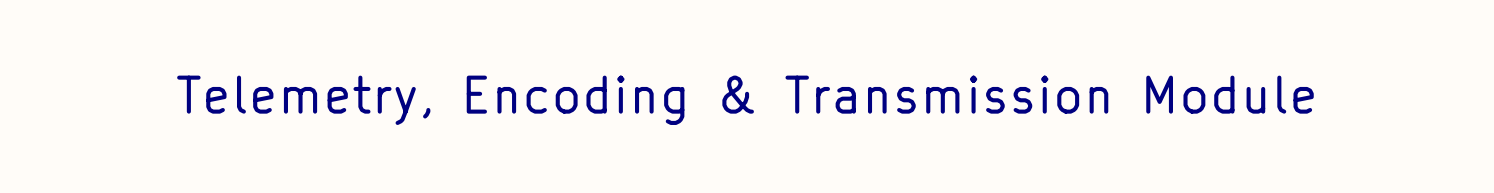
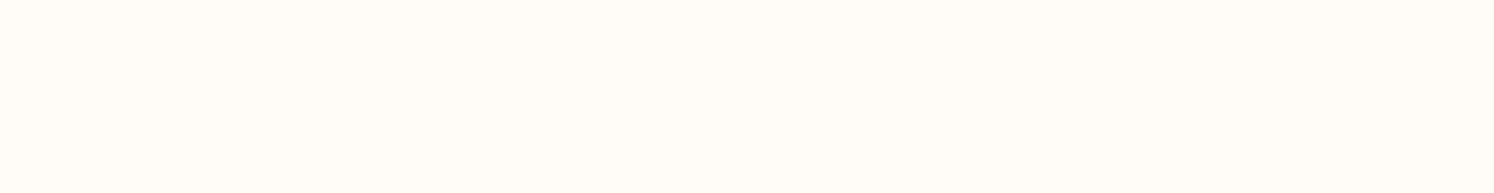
text: Telemetry, Encoding & Transmission Module (745, 100) -> none

